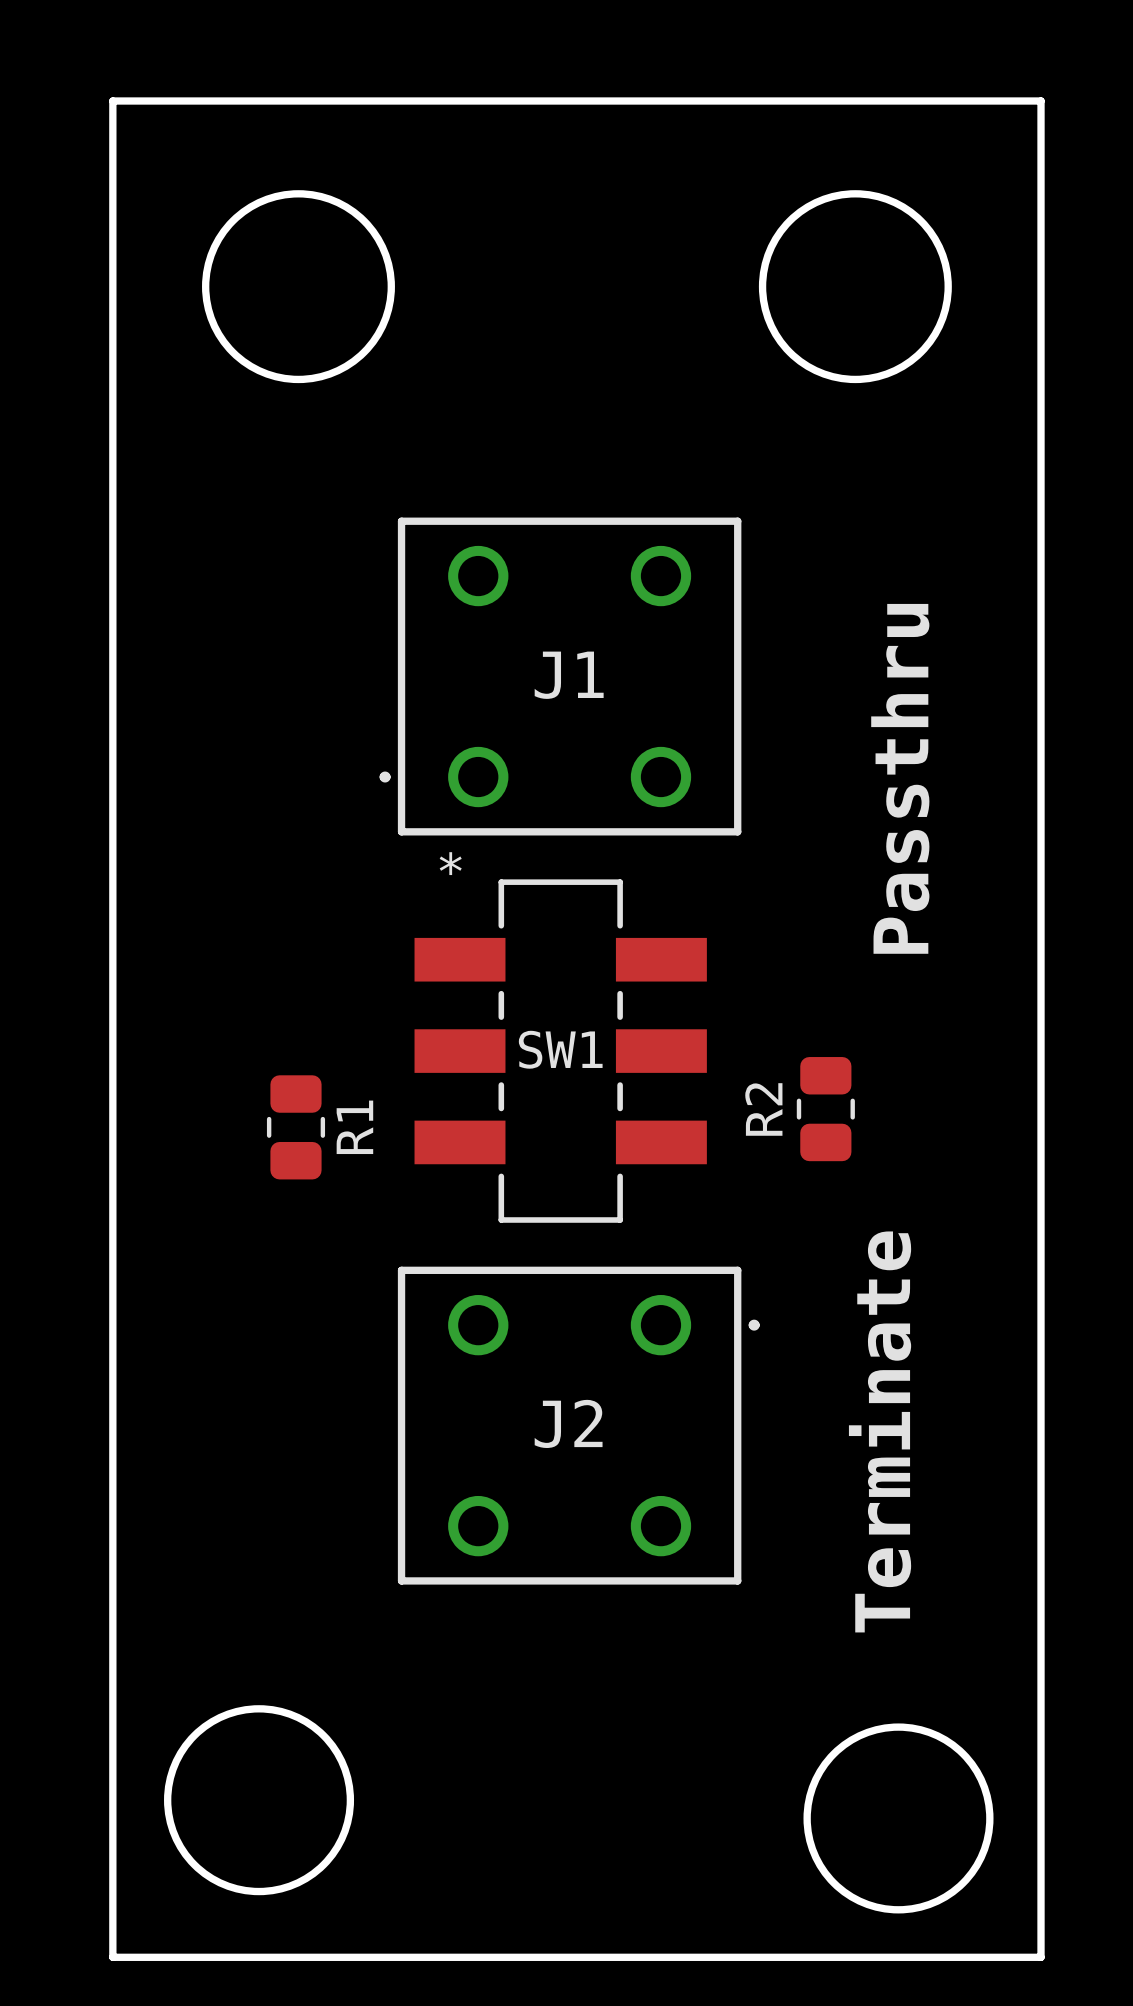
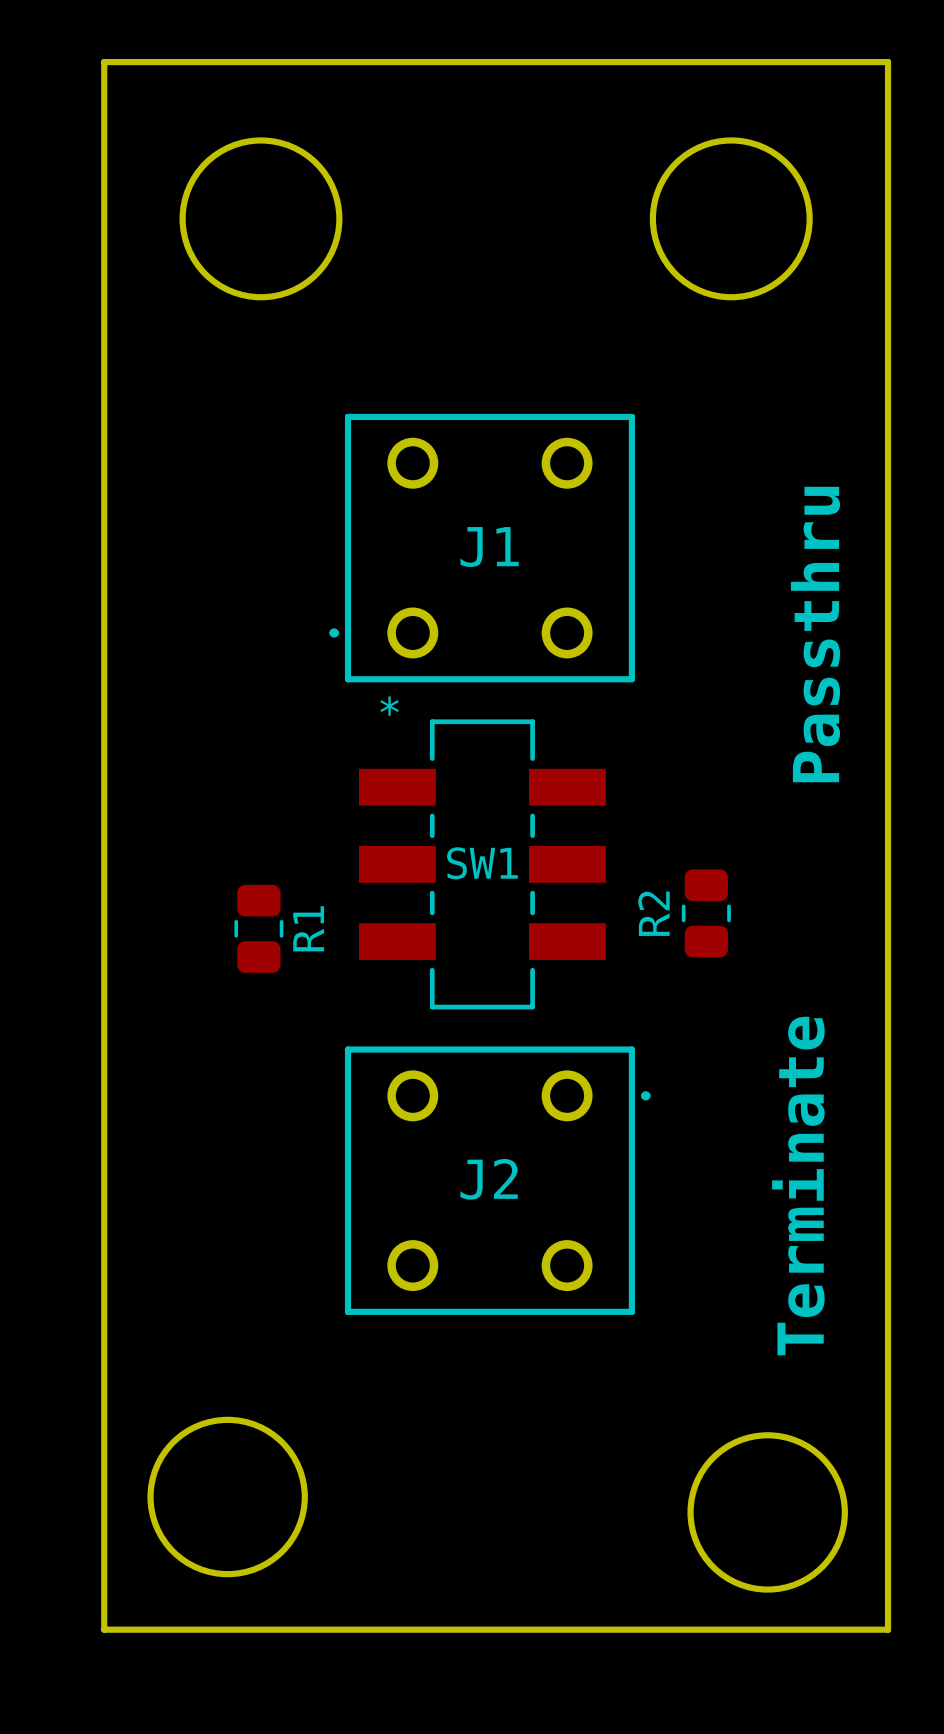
text position: Passthru (900, 778) -> Passthru (815, 634)
text position: Terminate (880, 1431) -> Terminate (798, 1186)

